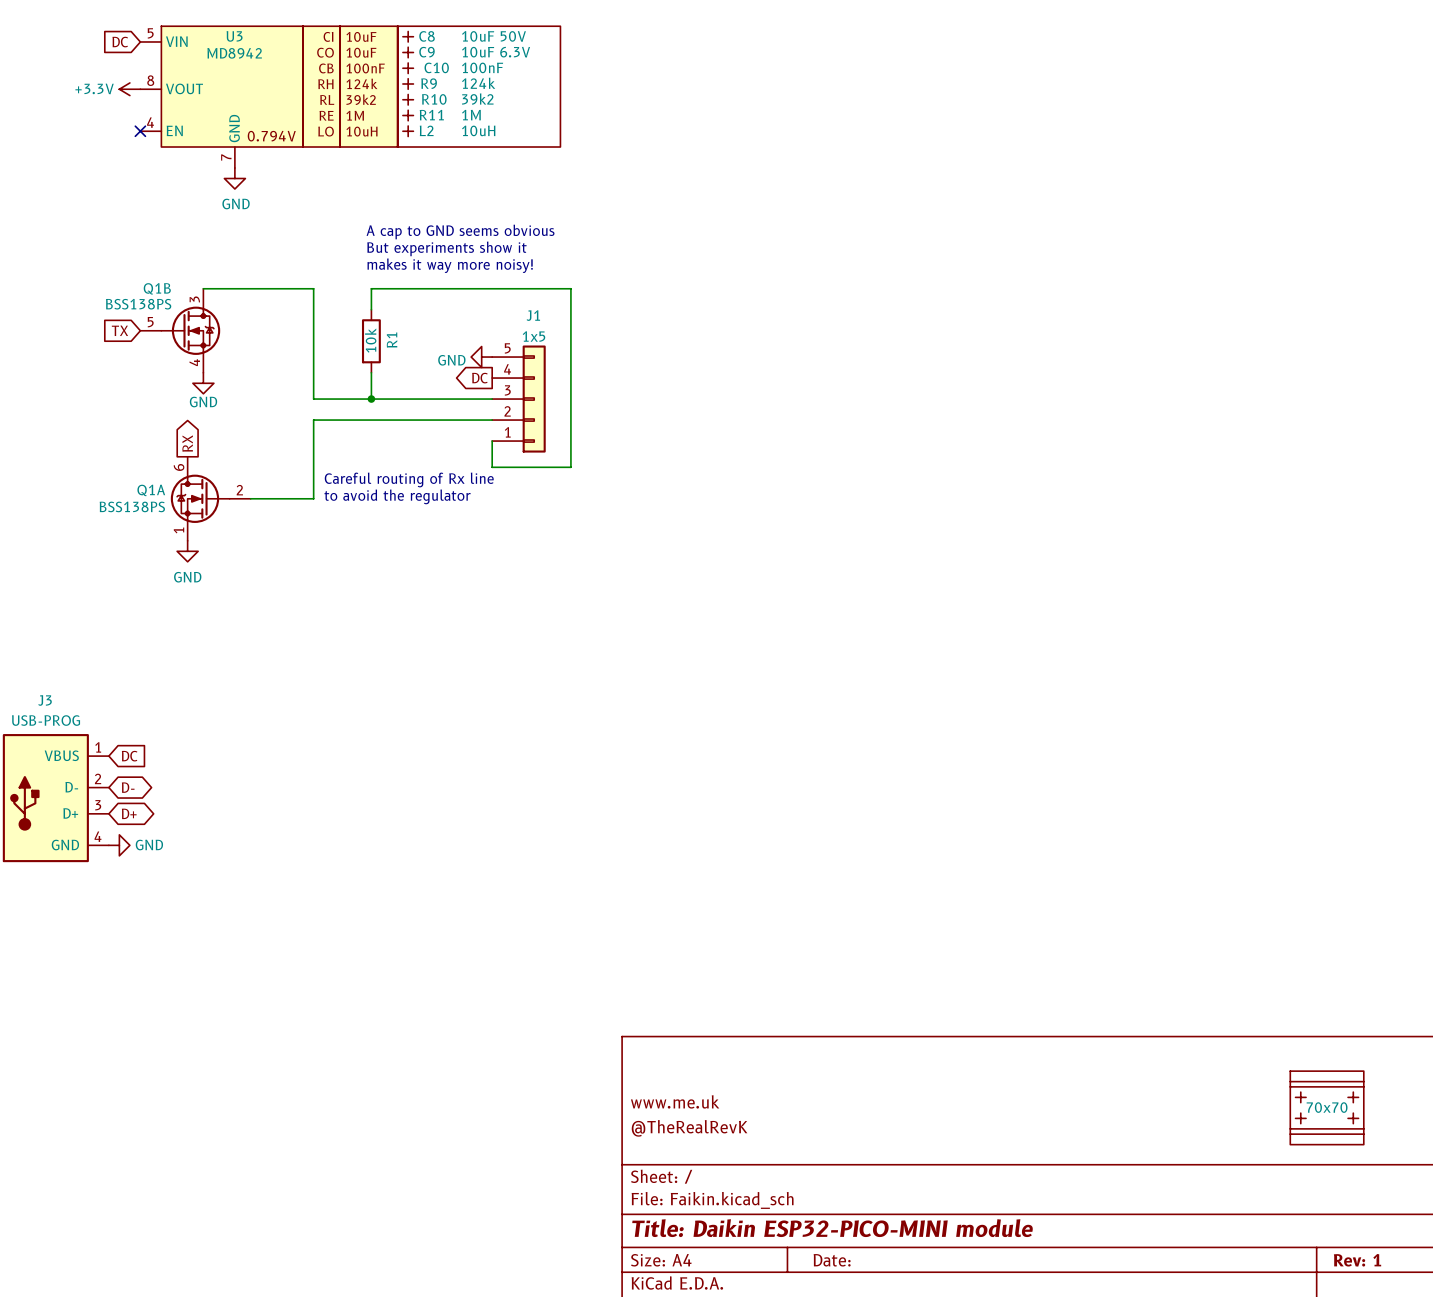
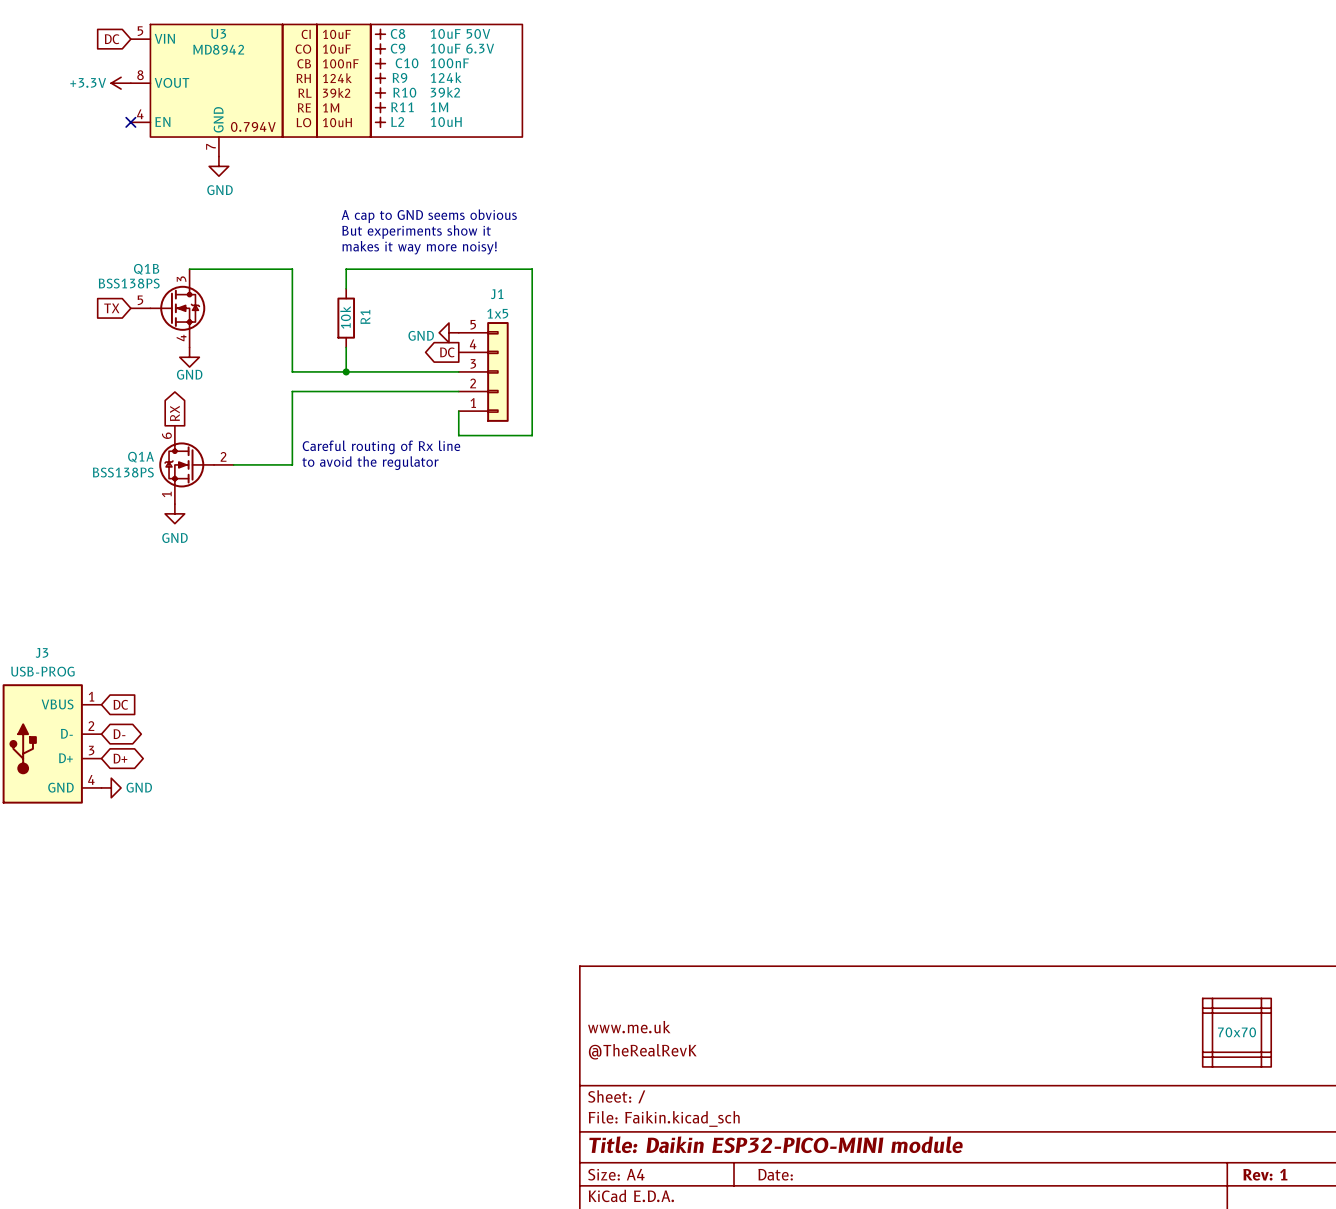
part: (1300, 1097) -> none
part: (1353, 1097) -> none
part: none -> (1212, 1032)
part: none -> (1261, 1032)
part: (1300, 1118) -> none
part: (1353, 1118) -> none

